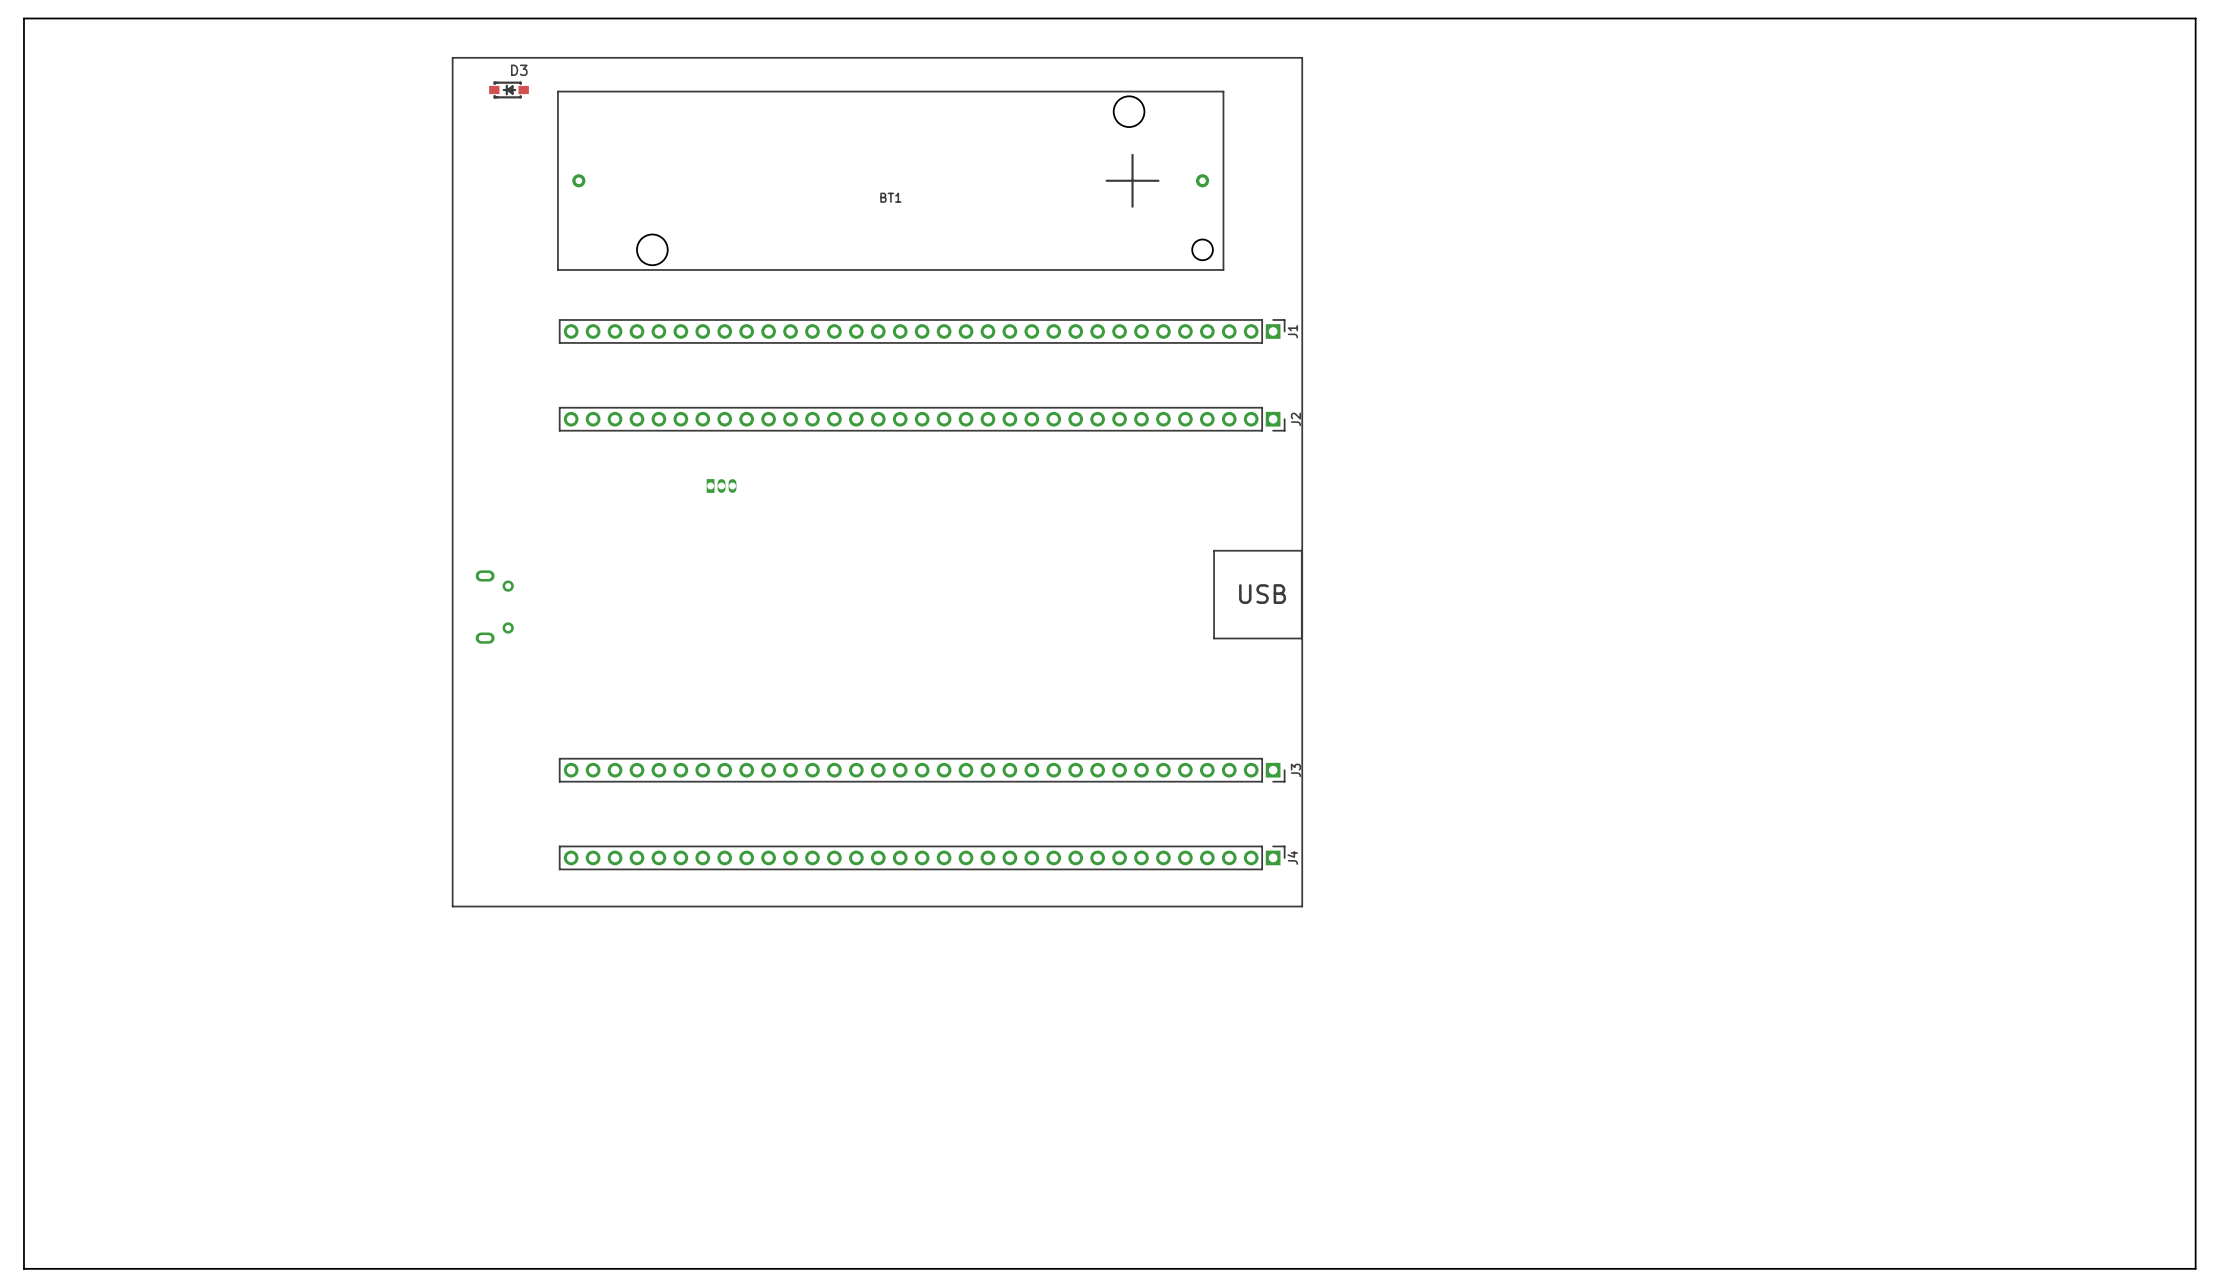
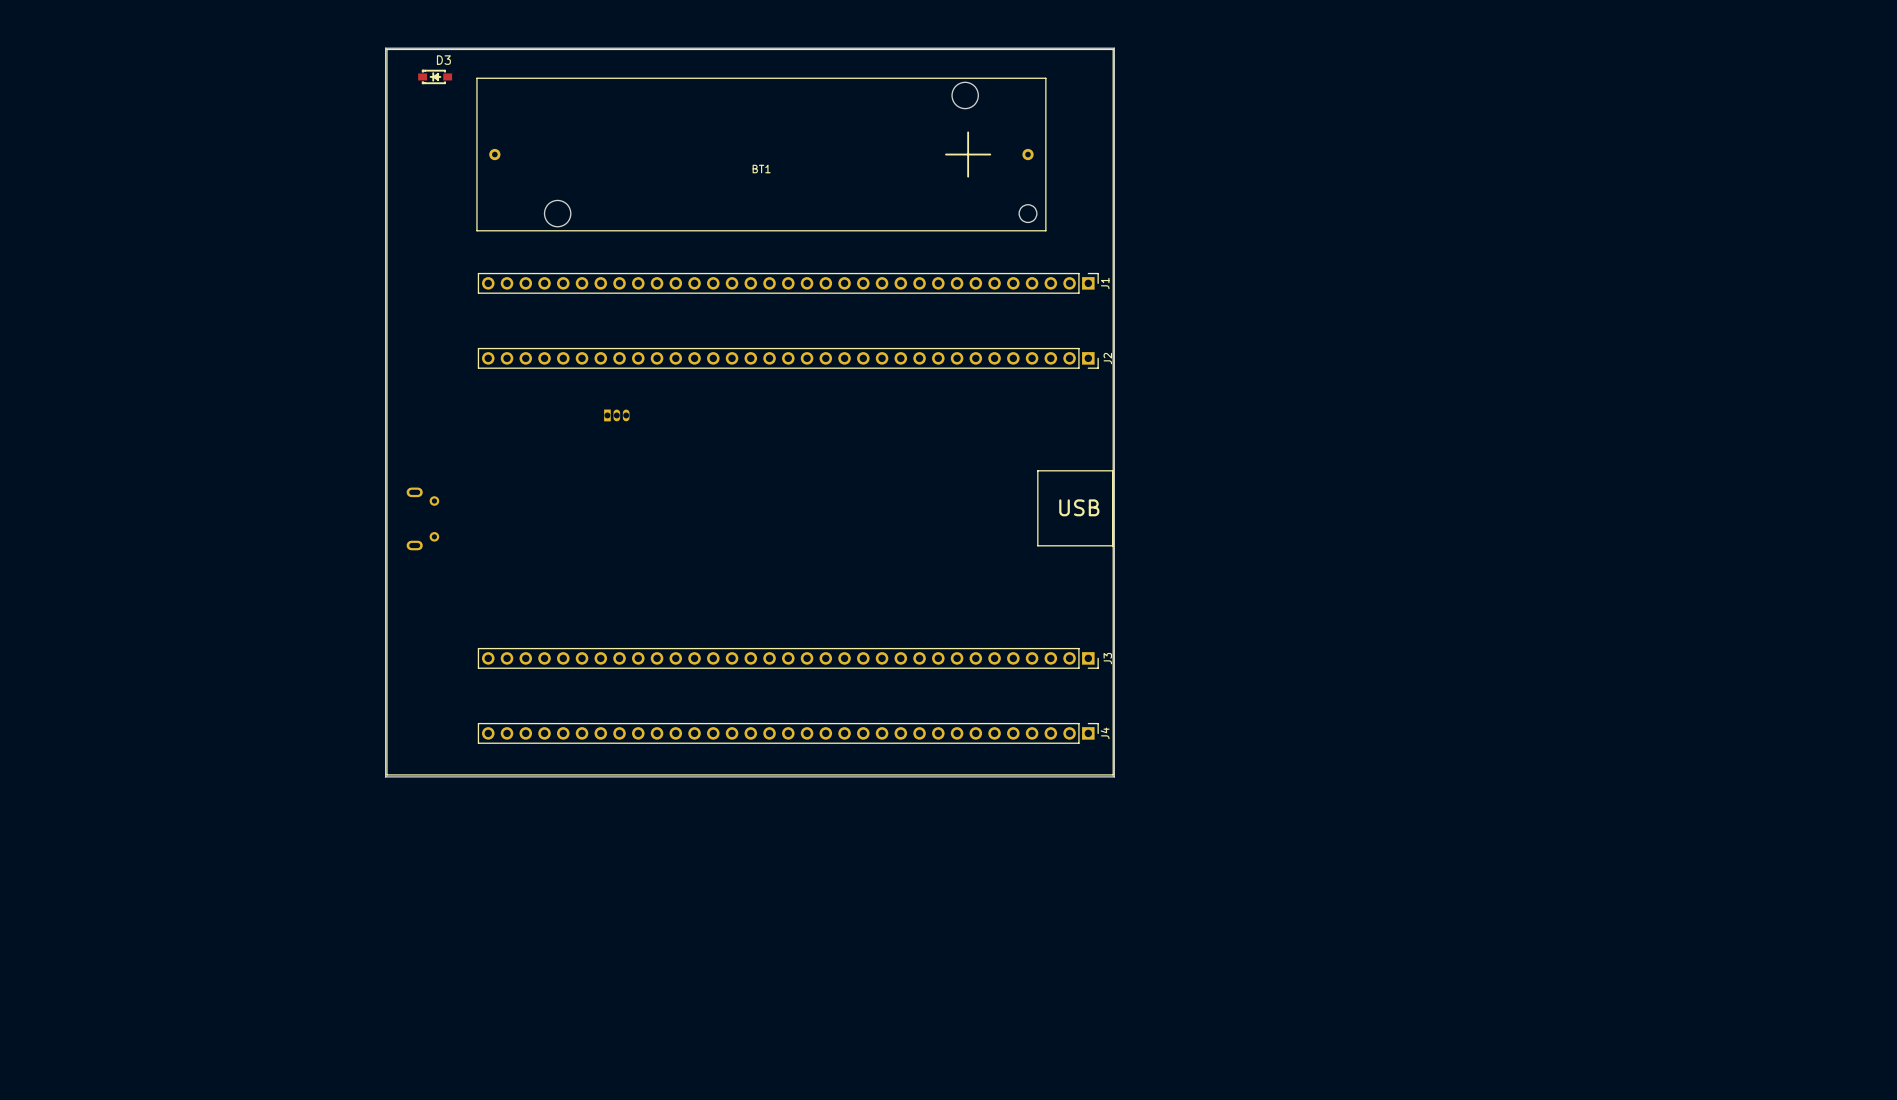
board edge: (23, 18) (2195, 18) (2195, 1268) (23, 1268) (23, 18) -> none
board edge: none -> (385, 48) (1114, 48) (1114, 776) (385, 776) (385, 48)

